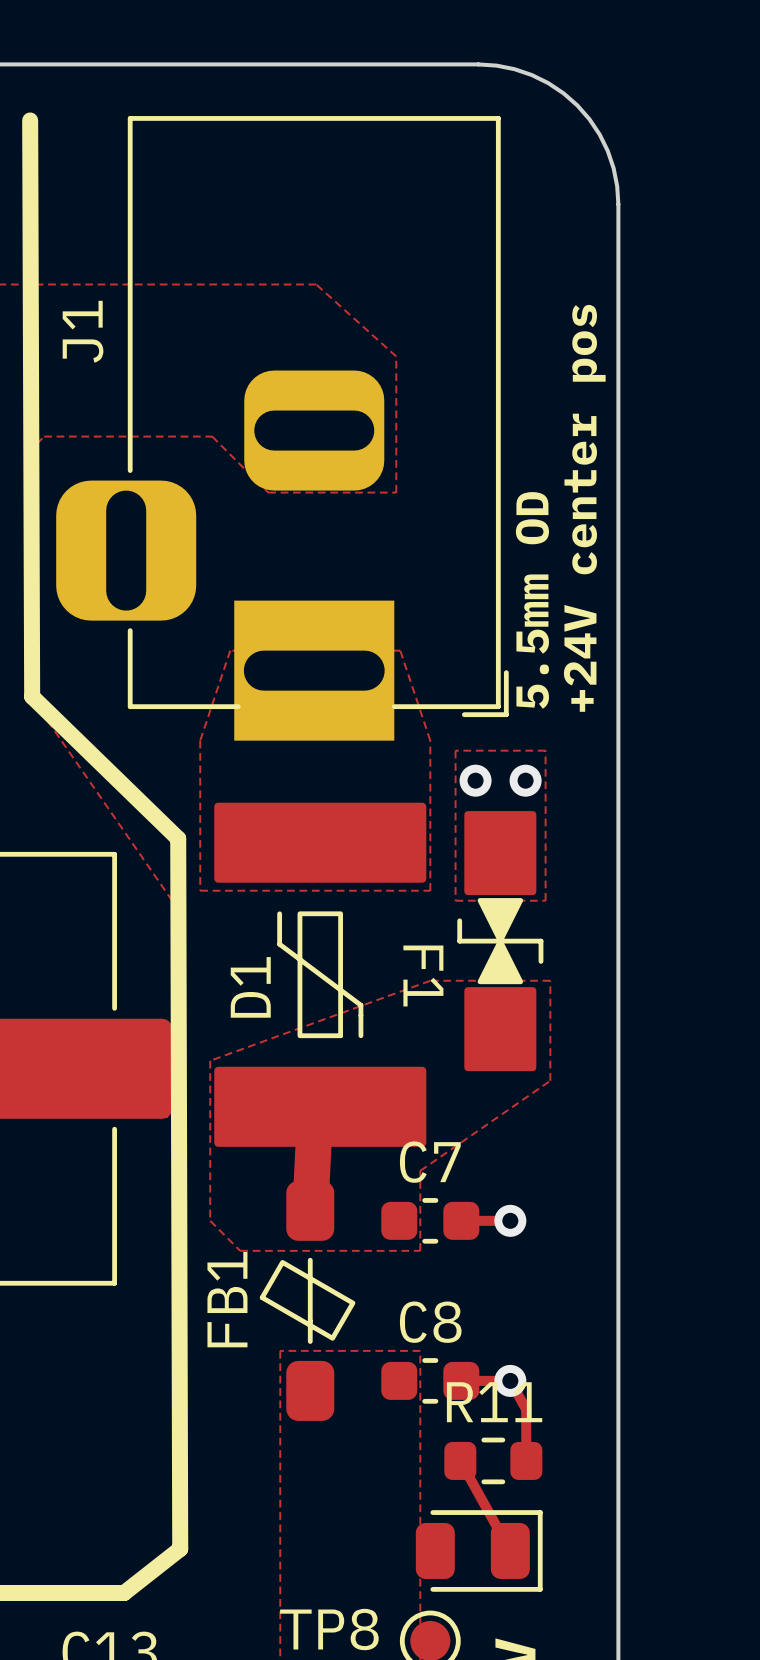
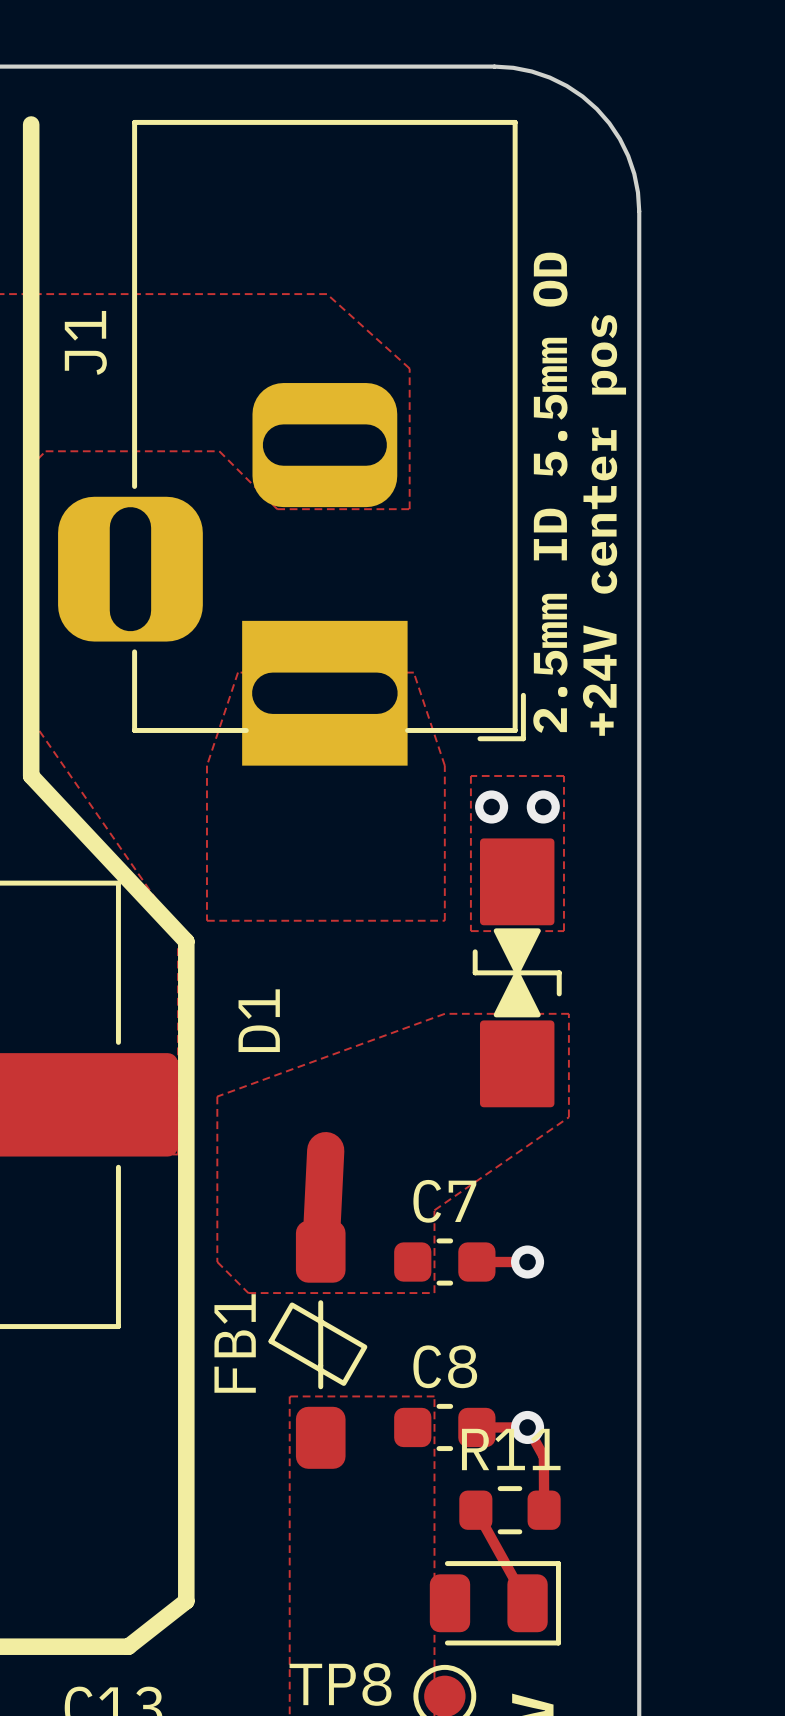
line: (30, 120) (32, 696) (178, 838) (180, 1548) -> (31, 124) (31, 775) (186, 941) (186, 1601)
text: 5.5mm OD (532, 600) -> 2.5mm ID 5.5mm OD (550, 492)
F1: (320, 974) -> none

